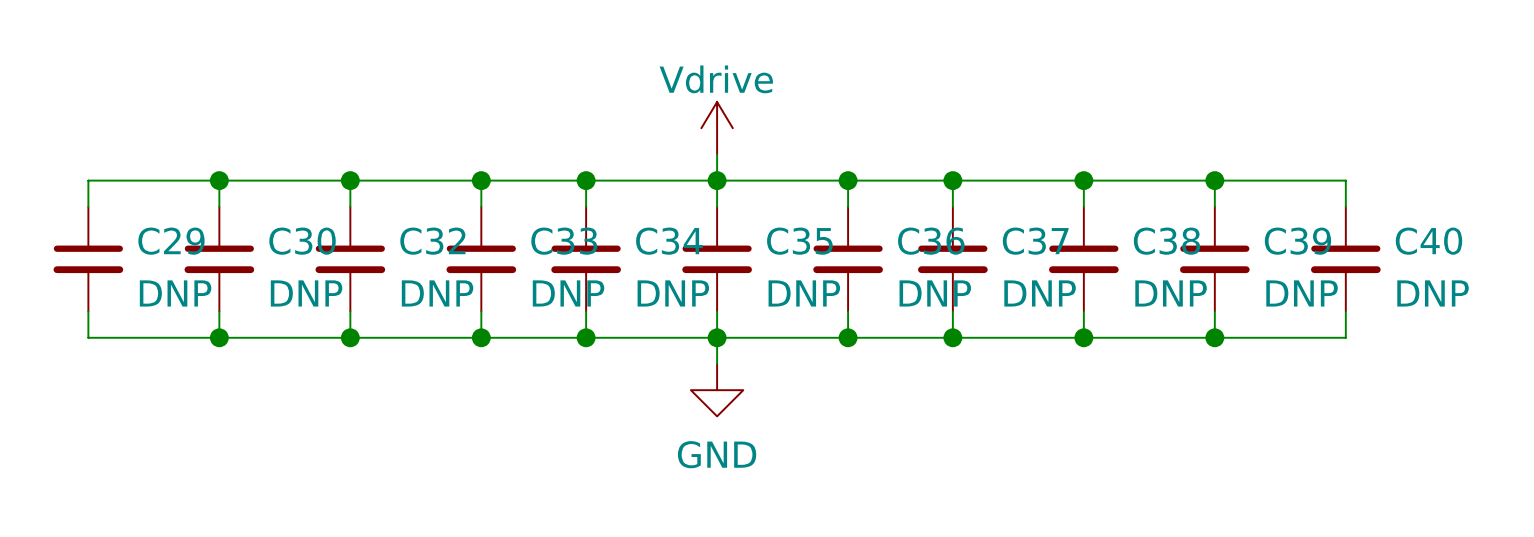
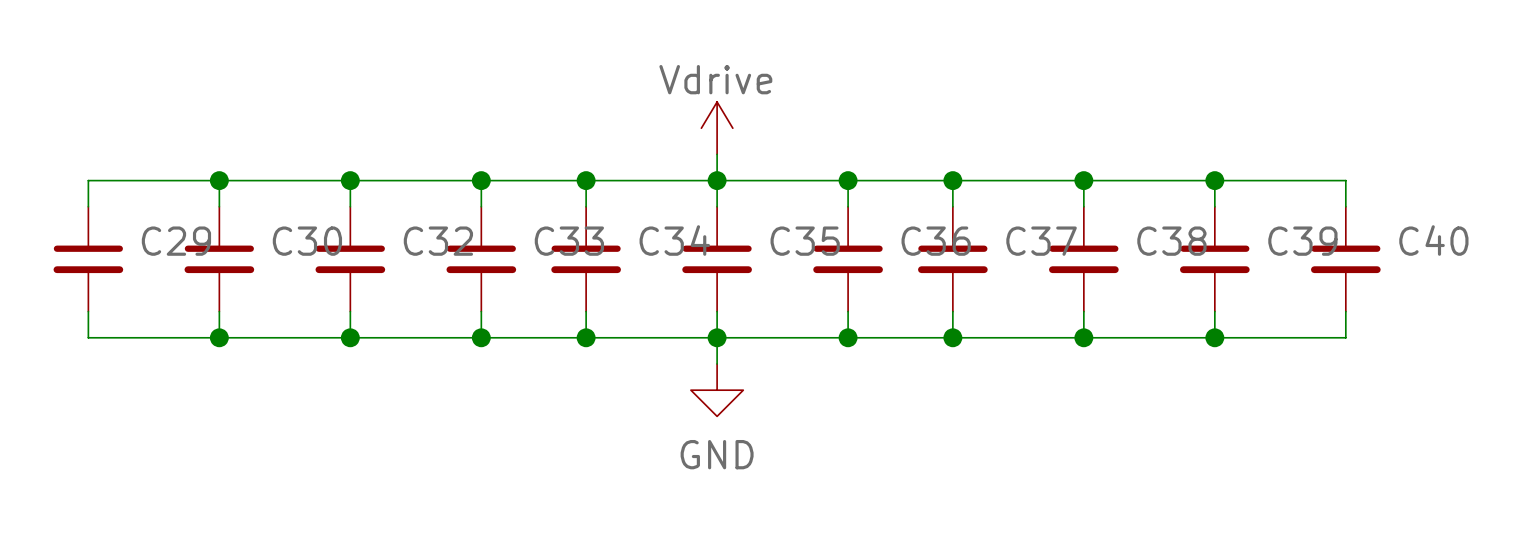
C29 value: DNP (175, 293) -> none
C30 value: DNP (306, 293) -> none
C32 value: DNP (437, 293) -> none
C33 value: DNP (568, 293) -> none
C34 value: DNP (673, 293) -> none
C35 value: DNP (804, 293) -> none
C36 value: DNP (935, 293) -> none
C37 value: DNP (1040, 293) -> none
C38 value: DNP (1171, 293) -> none
C39 value: DNP (1302, 293) -> none
C40 value: DNP (1433, 293) -> none

